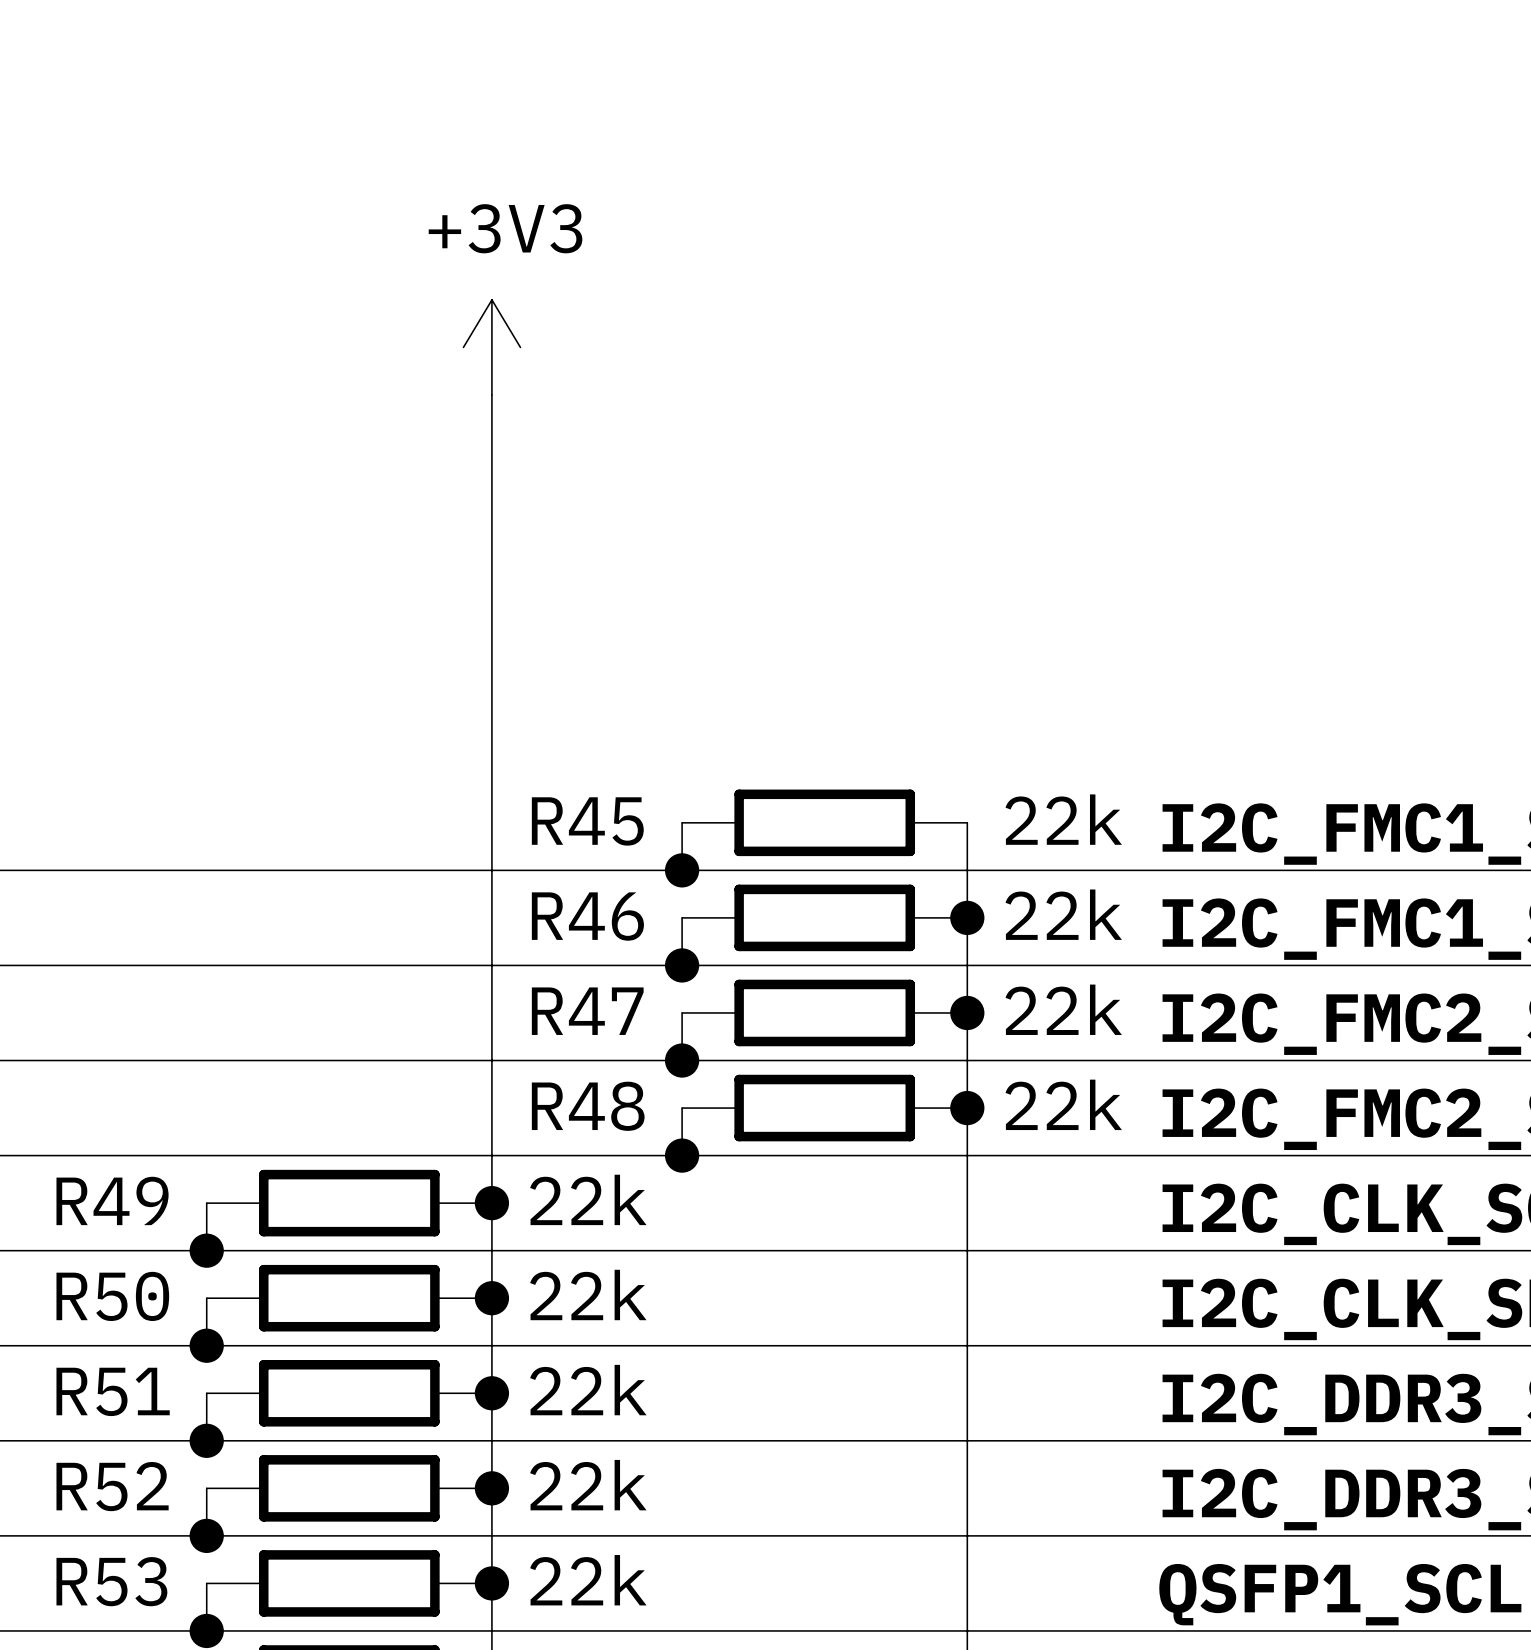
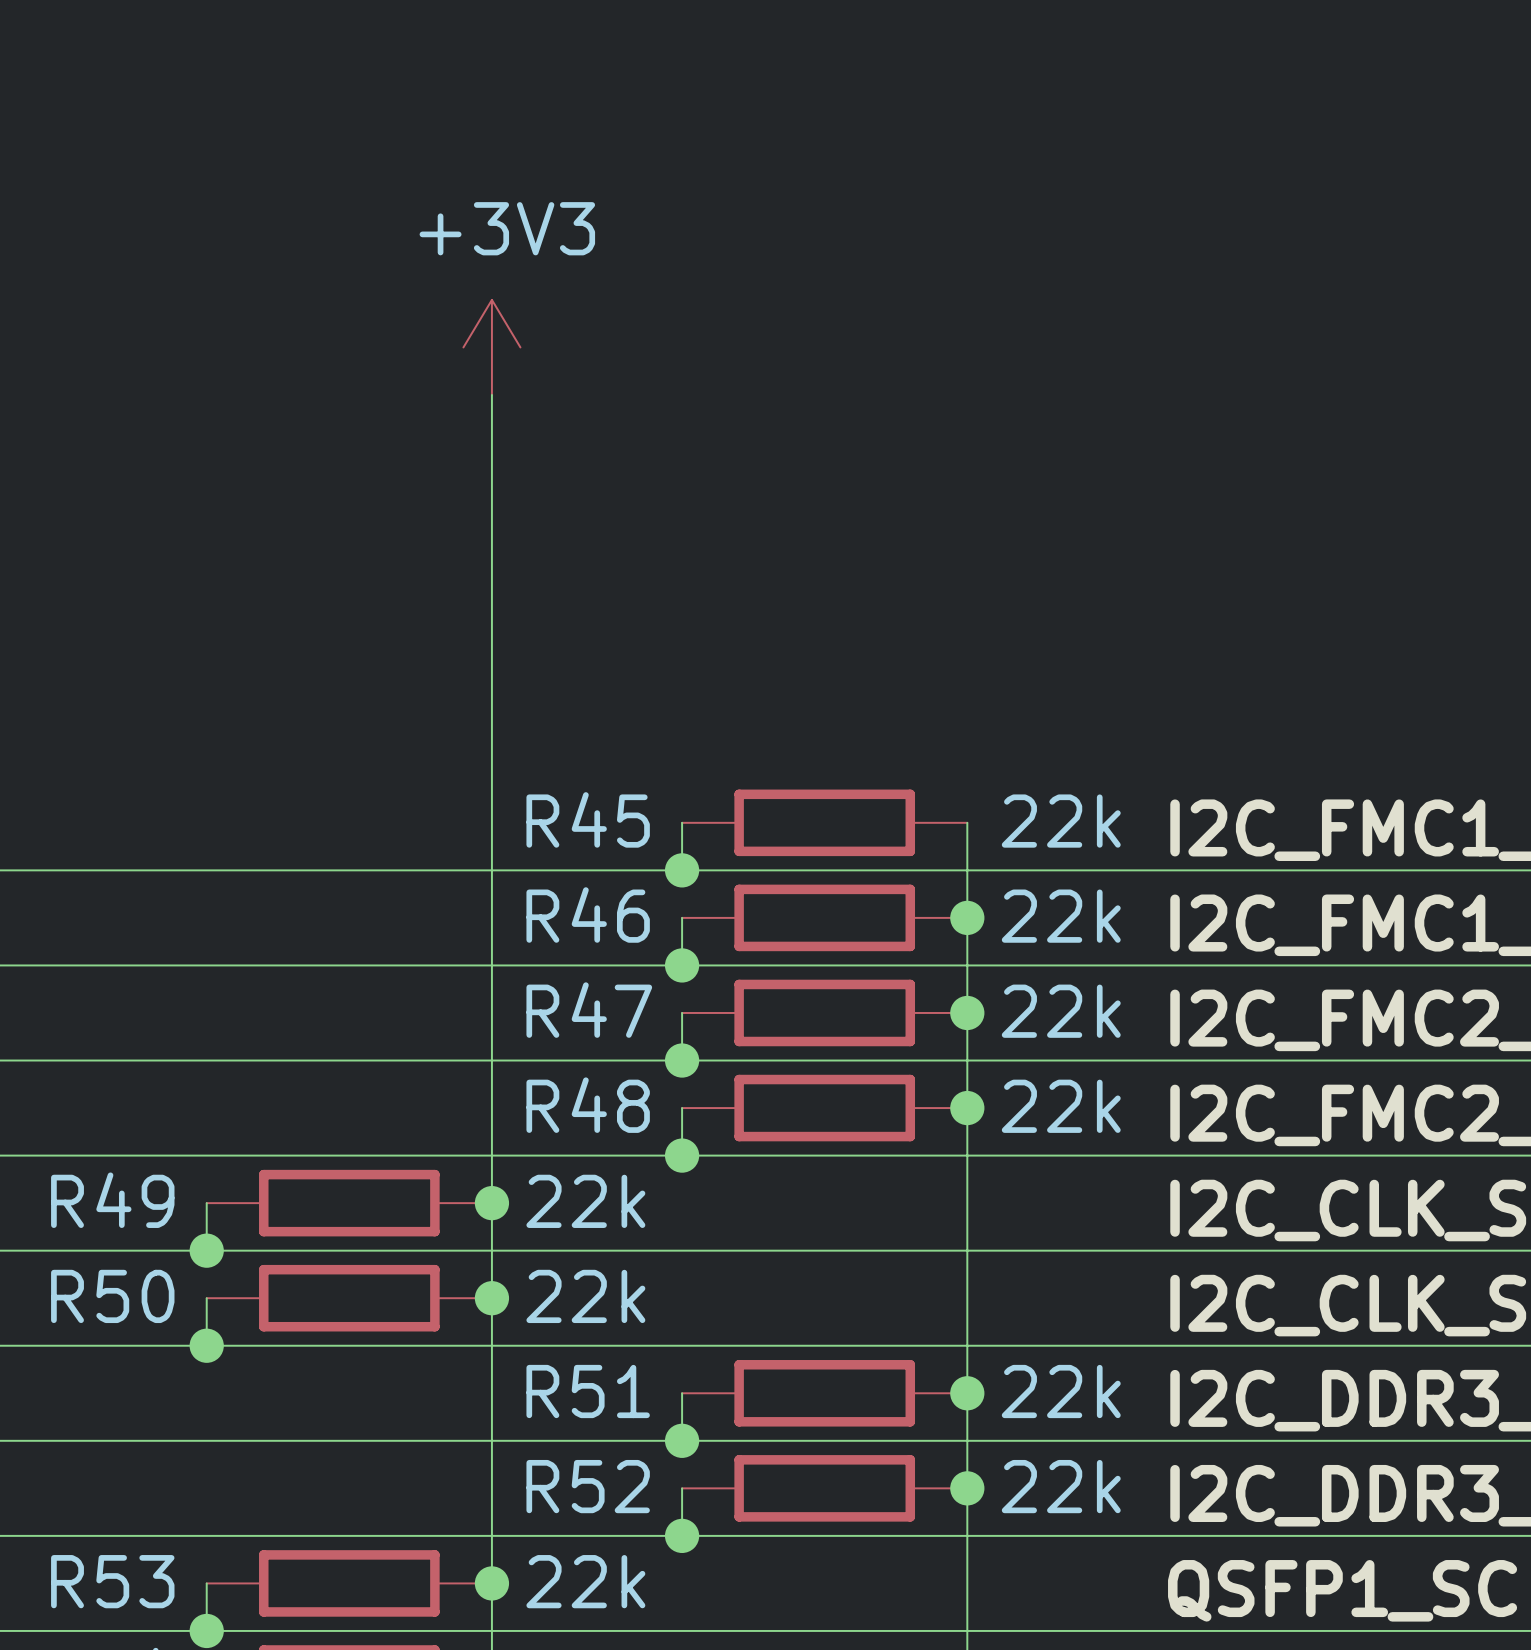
wire: (206, 1393) (206, 1440) -> (682, 1393) (682, 1440)
R51 position: (349, 1393) -> (824, 1393)
junction: (491, 1393) -> none
junction: none -> (967, 1393)
junction: (206, 1440) -> none
junction: none -> (682, 1440)
wire: (206, 1488) (206, 1535) -> (682, 1488) (682, 1535)
R52 position: (349, 1488) -> (824, 1488)
junction: (491, 1488) -> none
junction: none -> (967, 1488)
junction: (206, 1535) -> none
junction: none -> (682, 1535)

